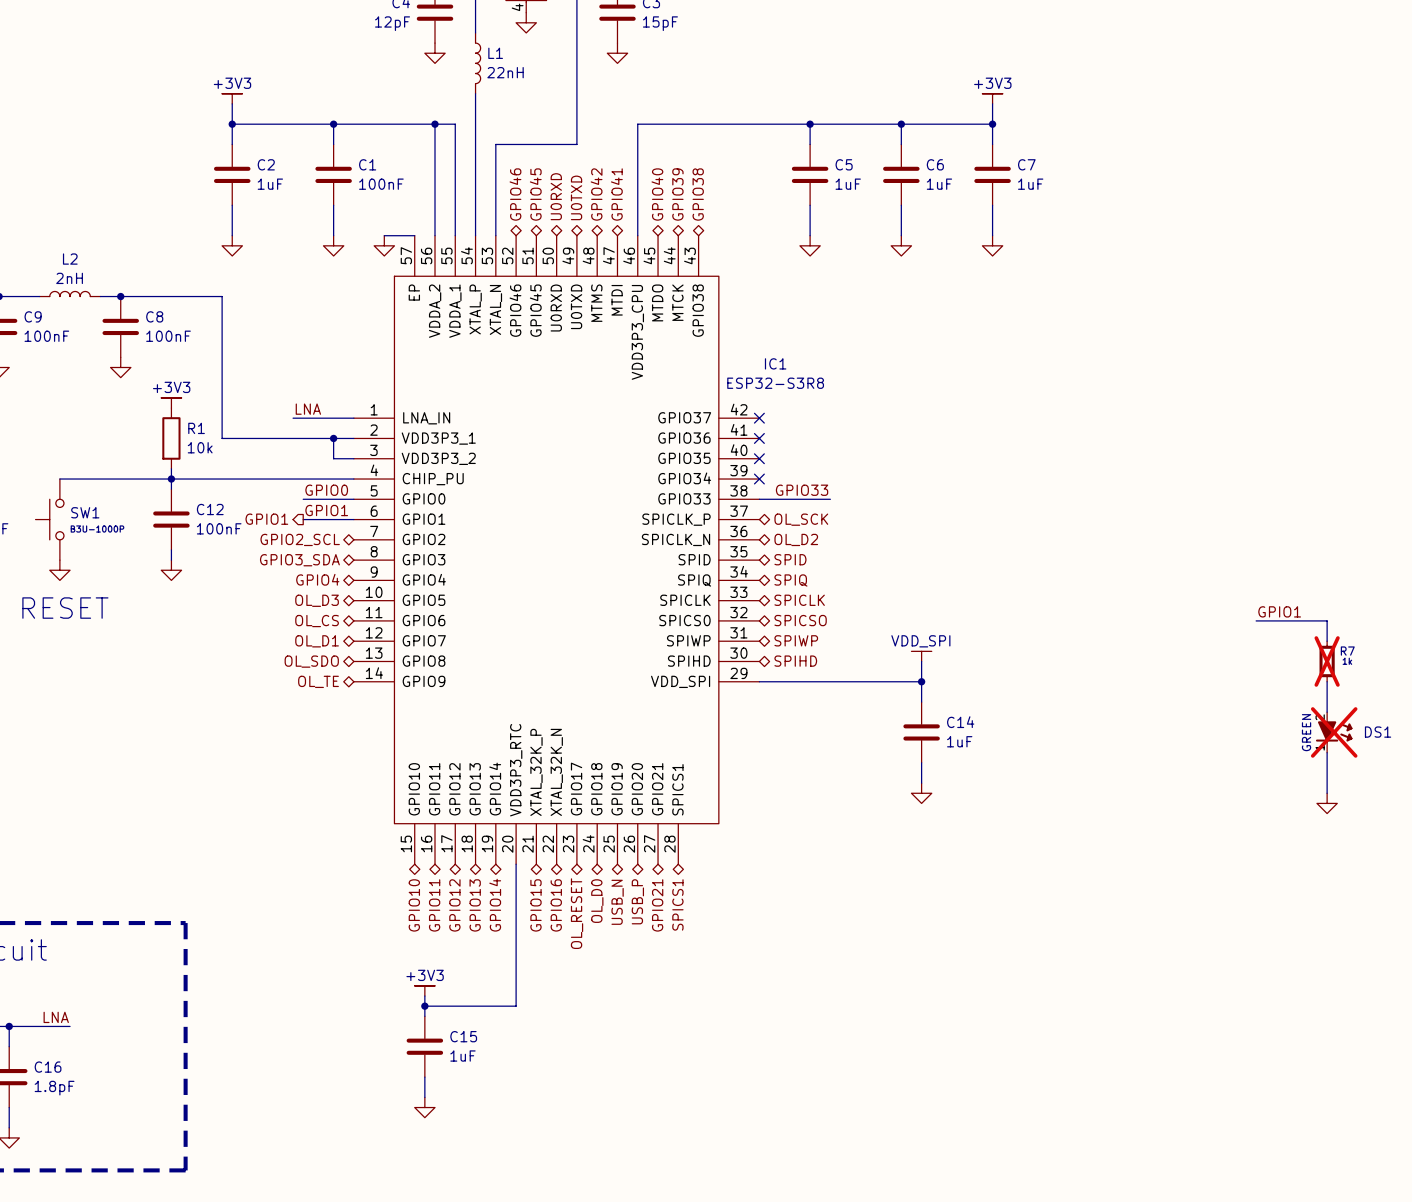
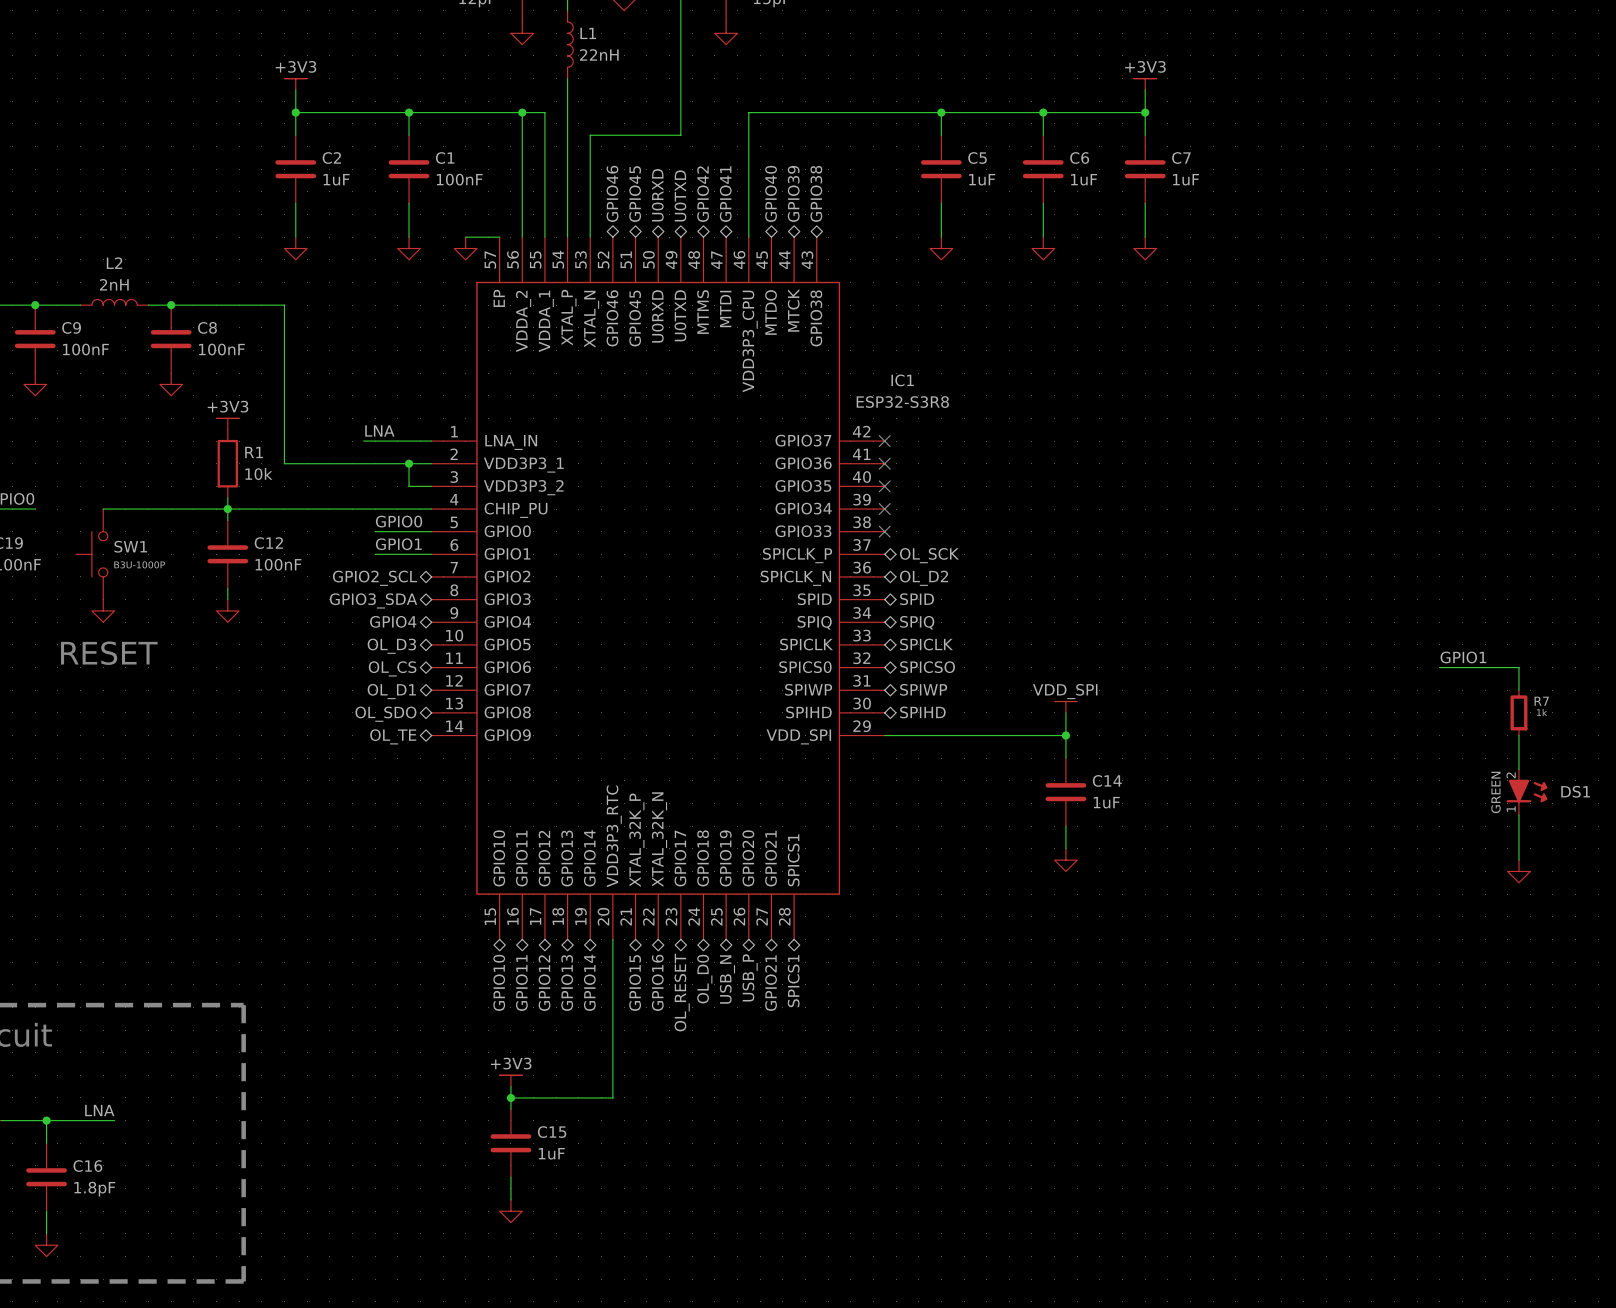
label: GPIO33 (802, 490) -> none
wire: (759, 499) (830, 499) -> none
no-connect mark: none -> (884, 531)
hierarchical label: GPIO1 (266, 519) -> none
R7 do-not-place cross: (1327, 661) -> none
DS1 do-not-place cross: (1334, 732) -> none

